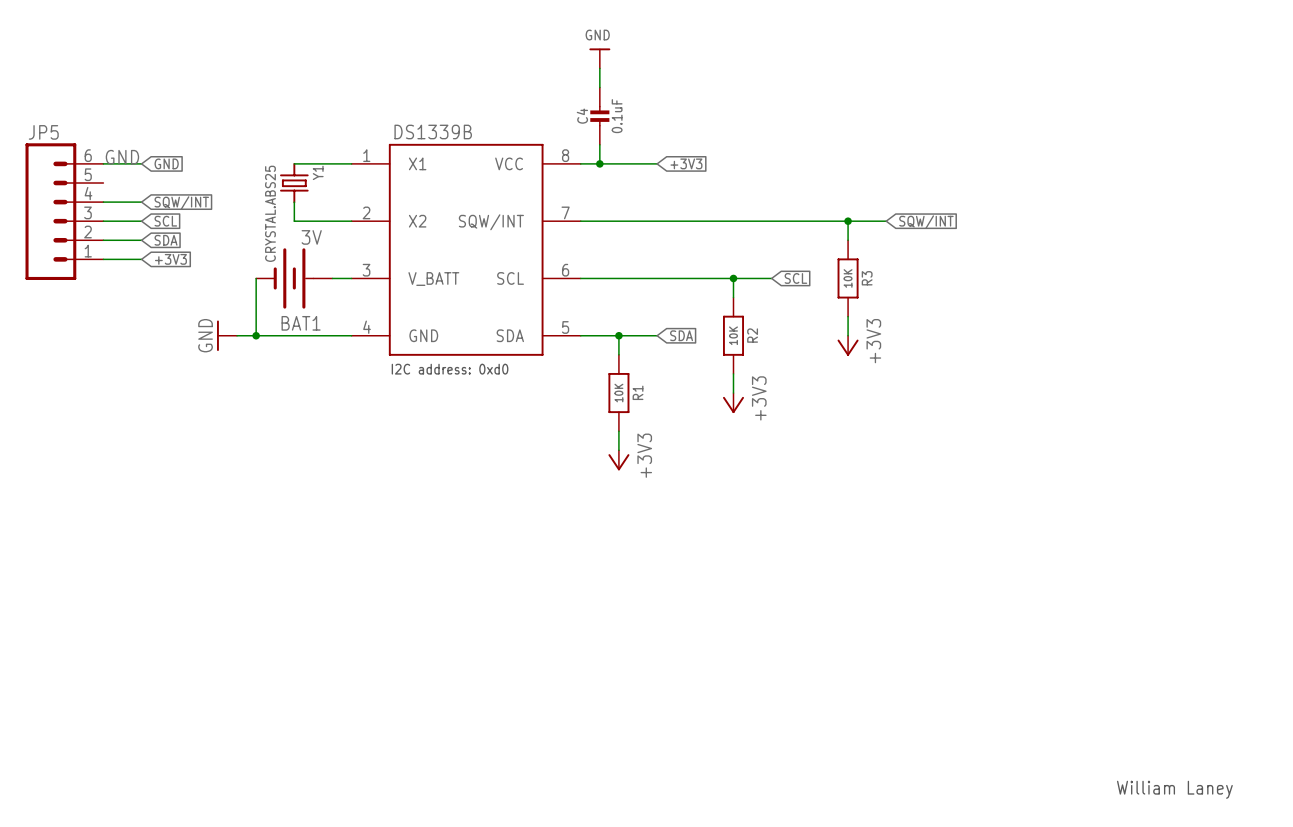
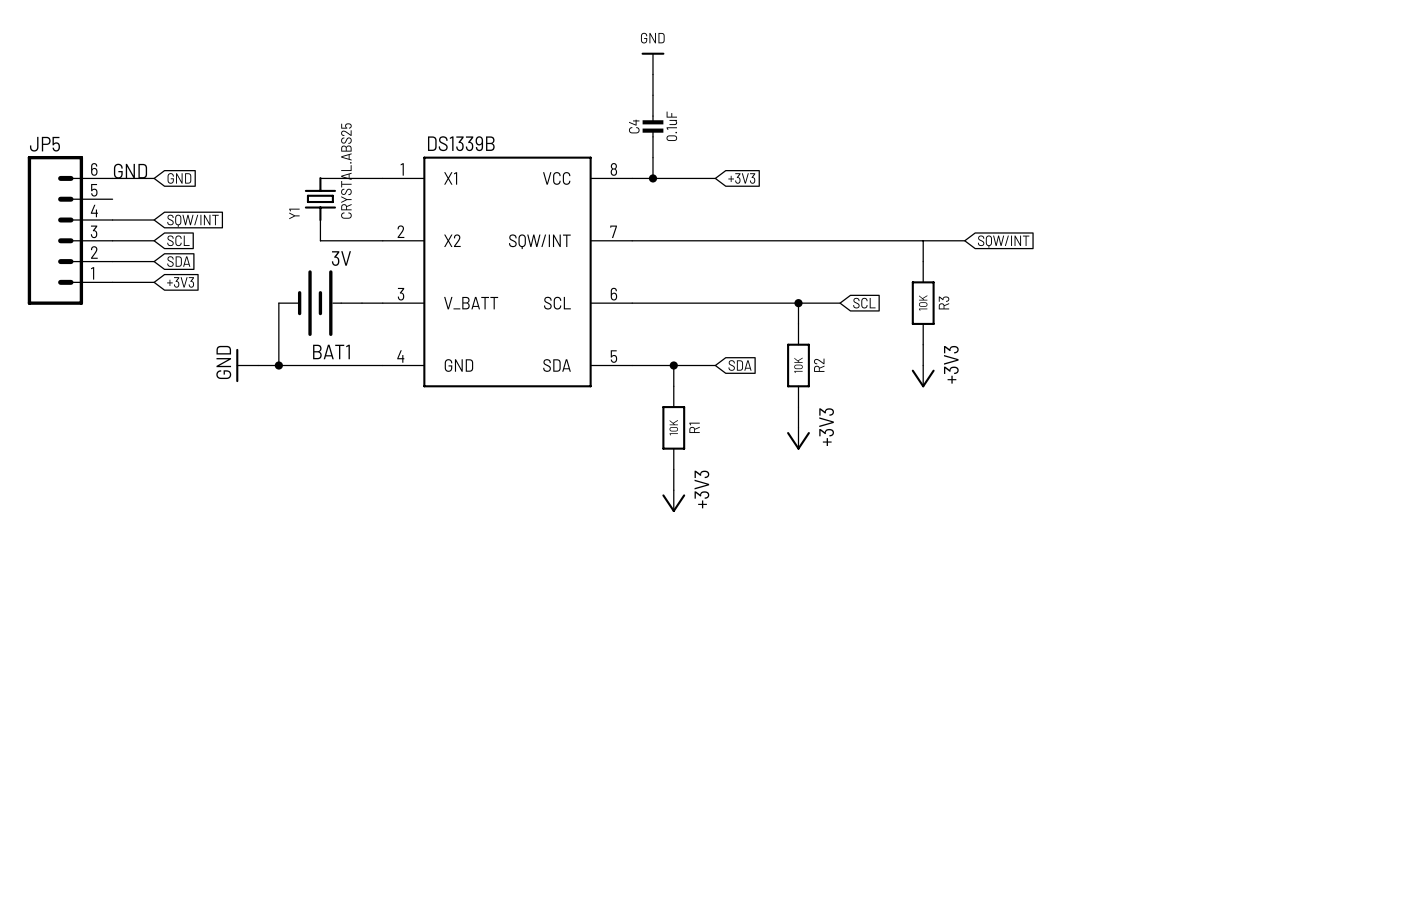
Y1 rotation: 0° (294, 183) -> 180° (320, 199)
junction: (848, 221) -> none
text: I2C address: 0xd0 (450, 369) -> none
text: William Laney (1174, 789) -> none

